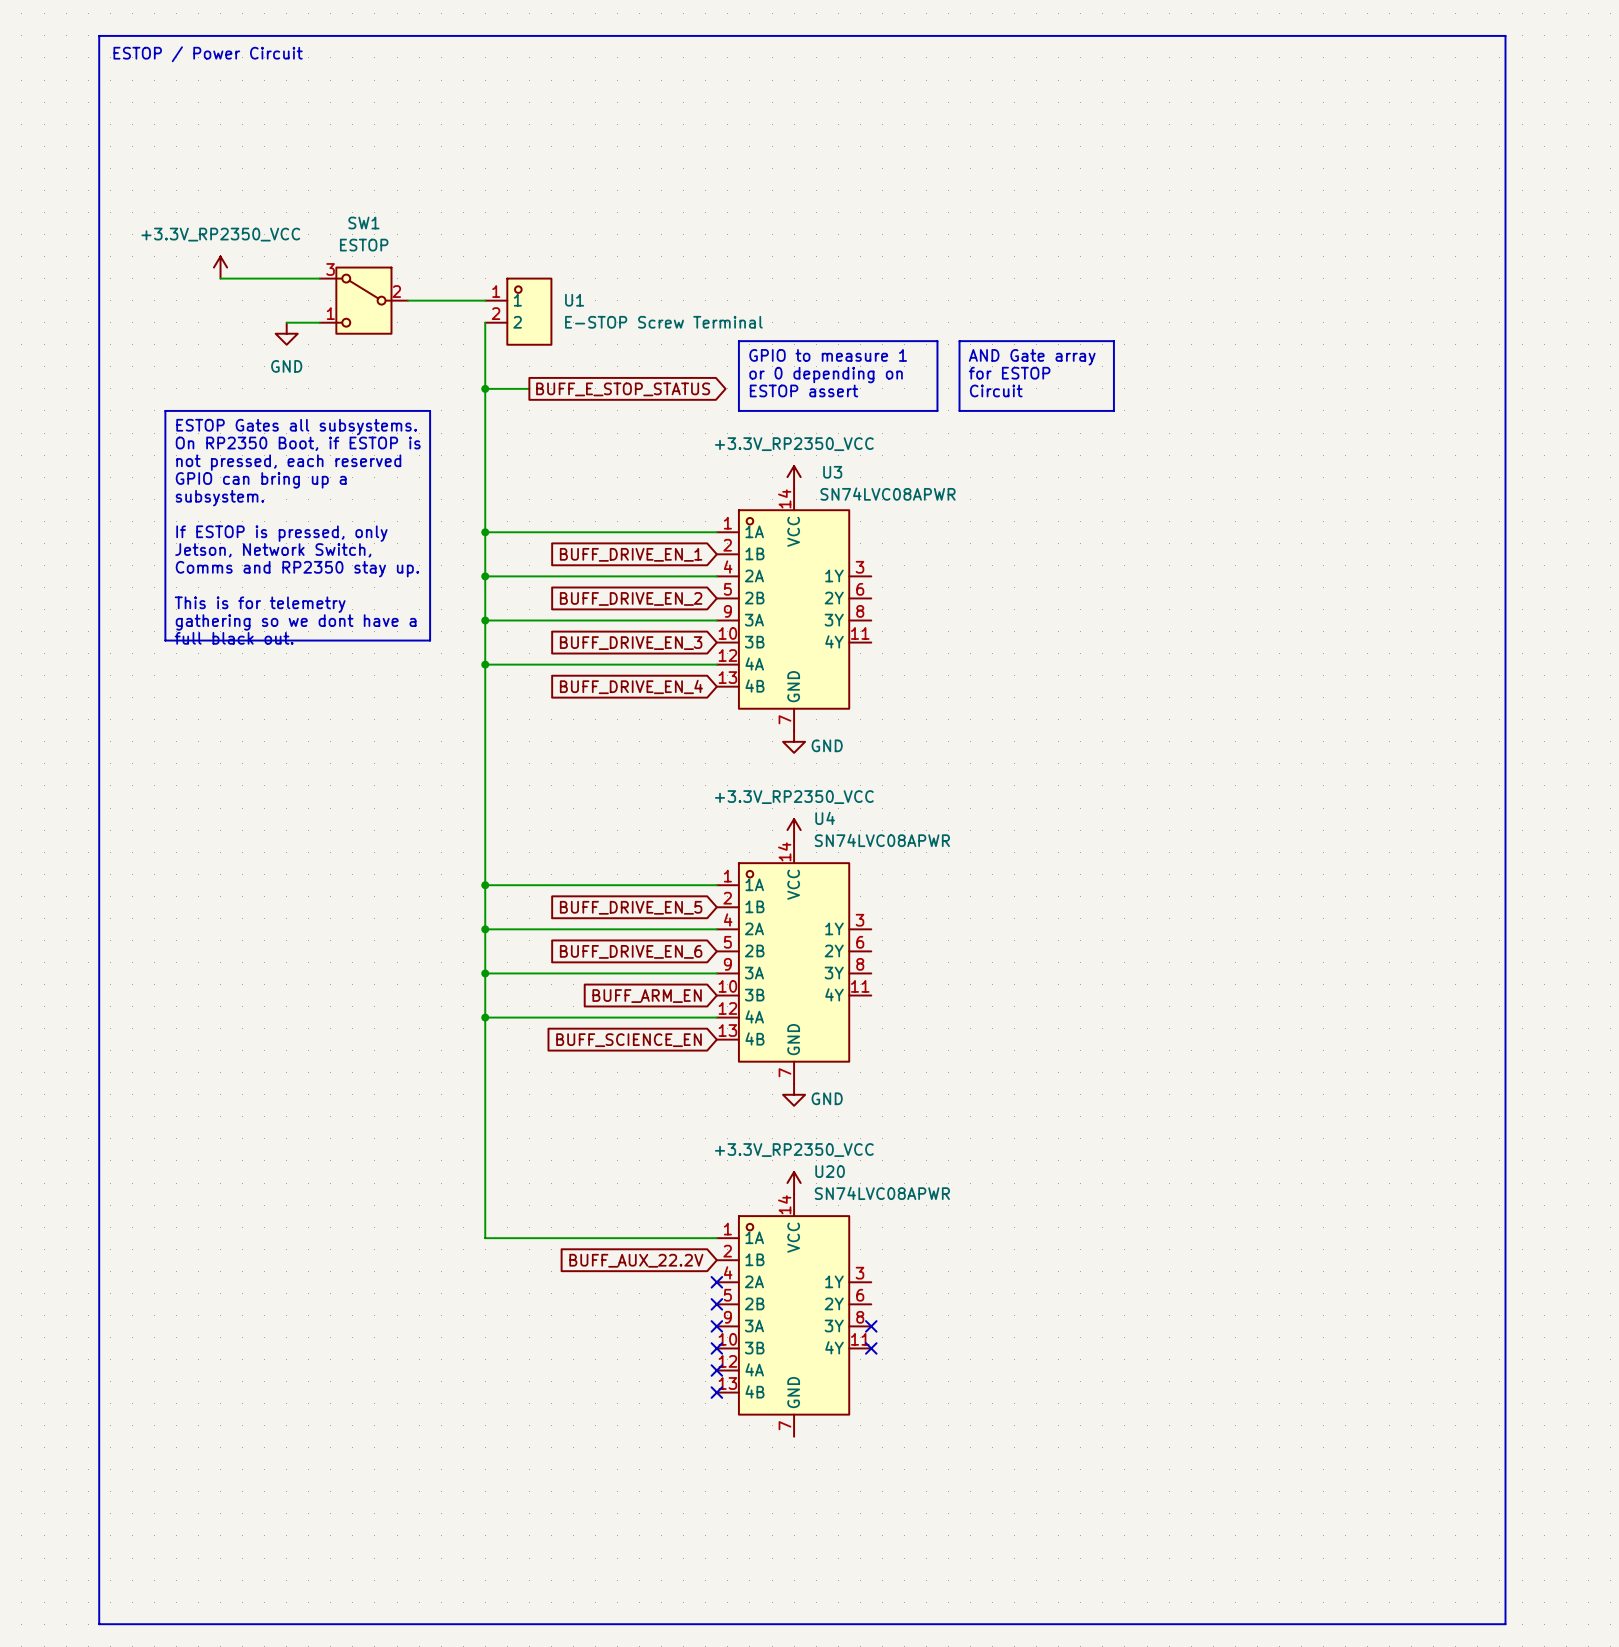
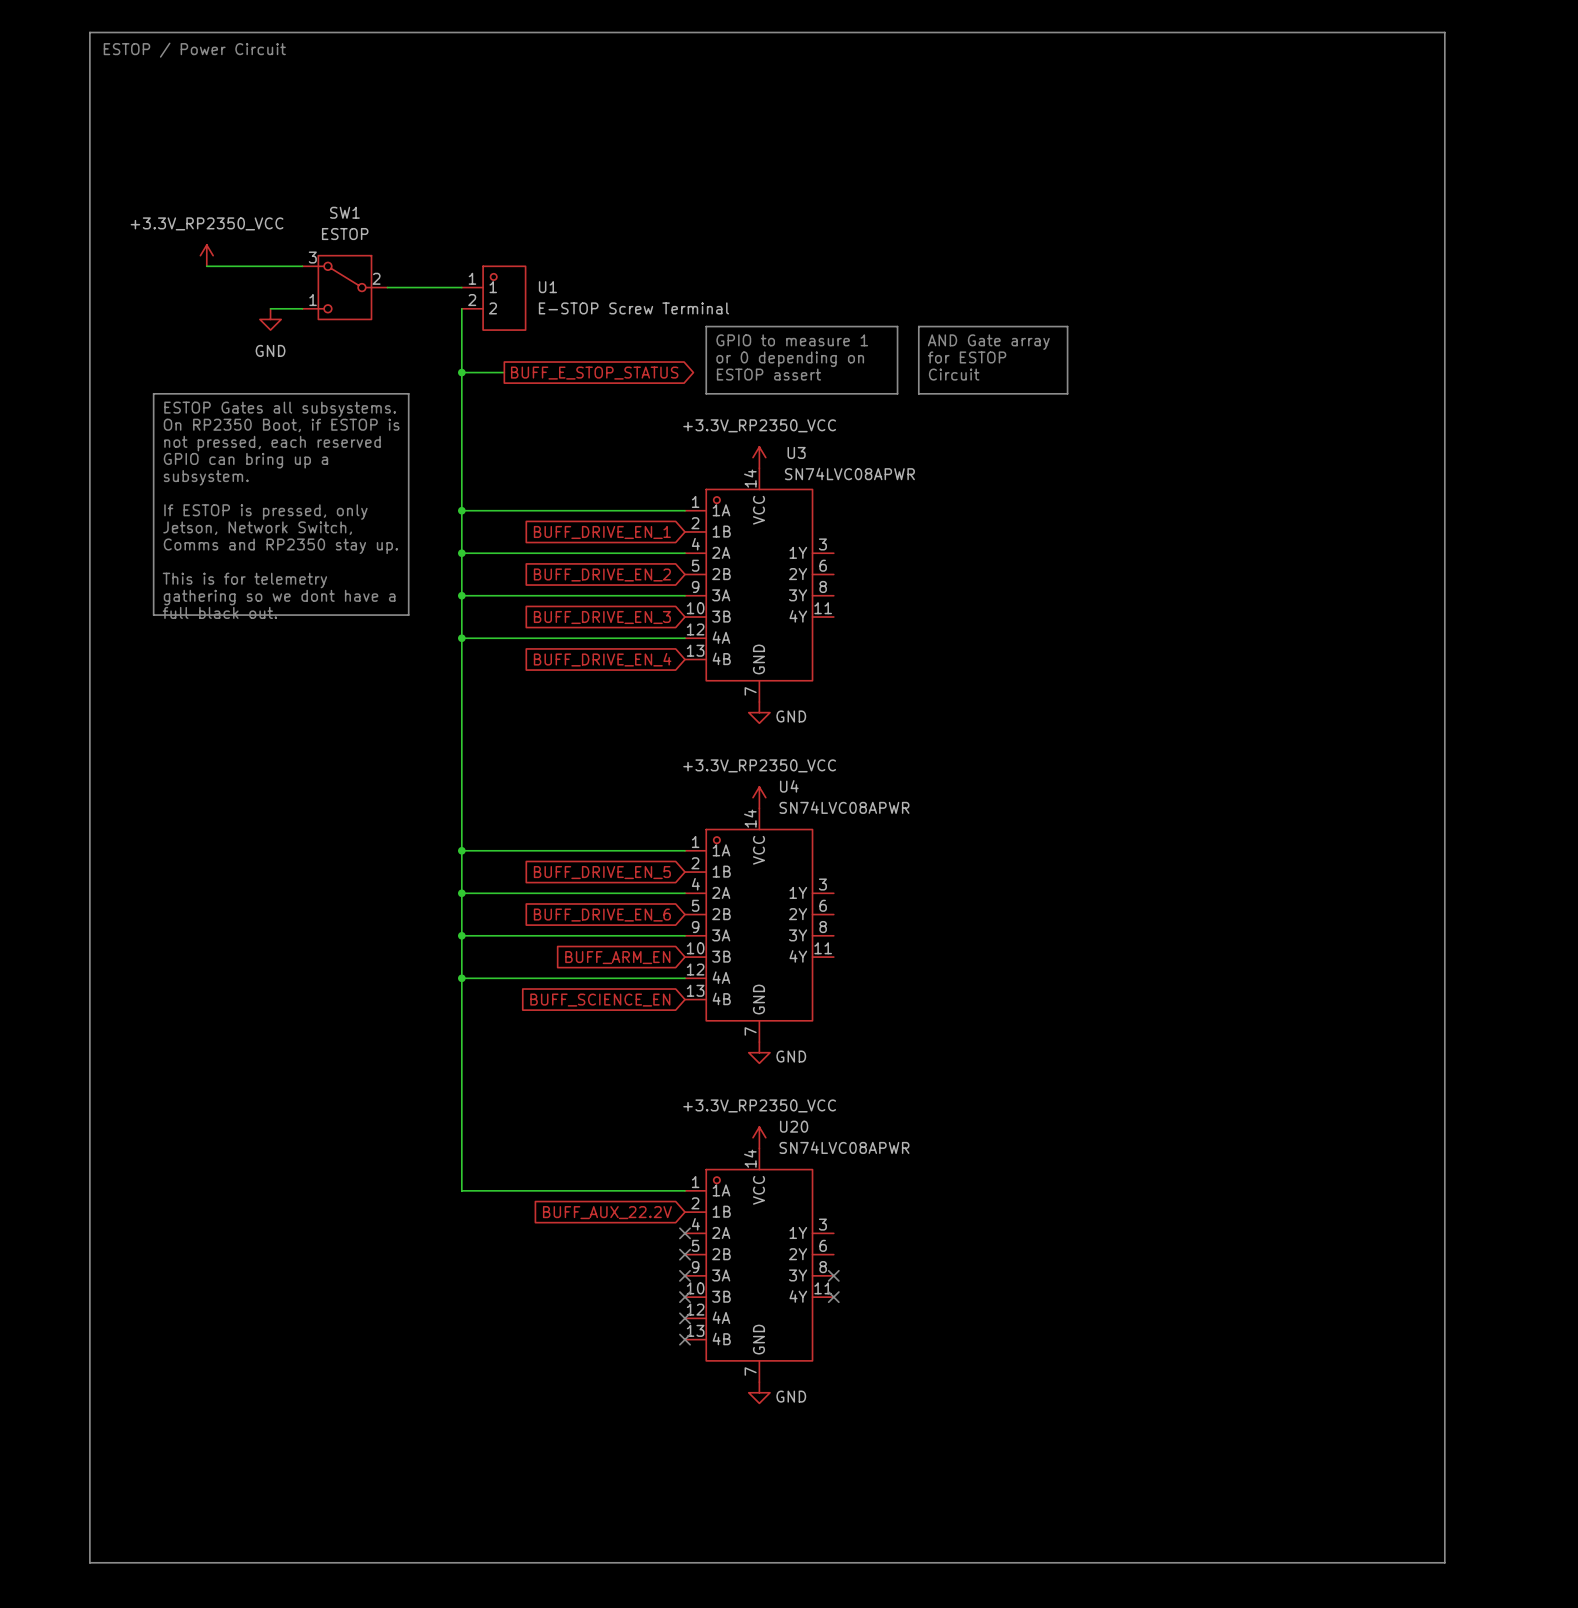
power symbol: none -> GND (759, 1392)

